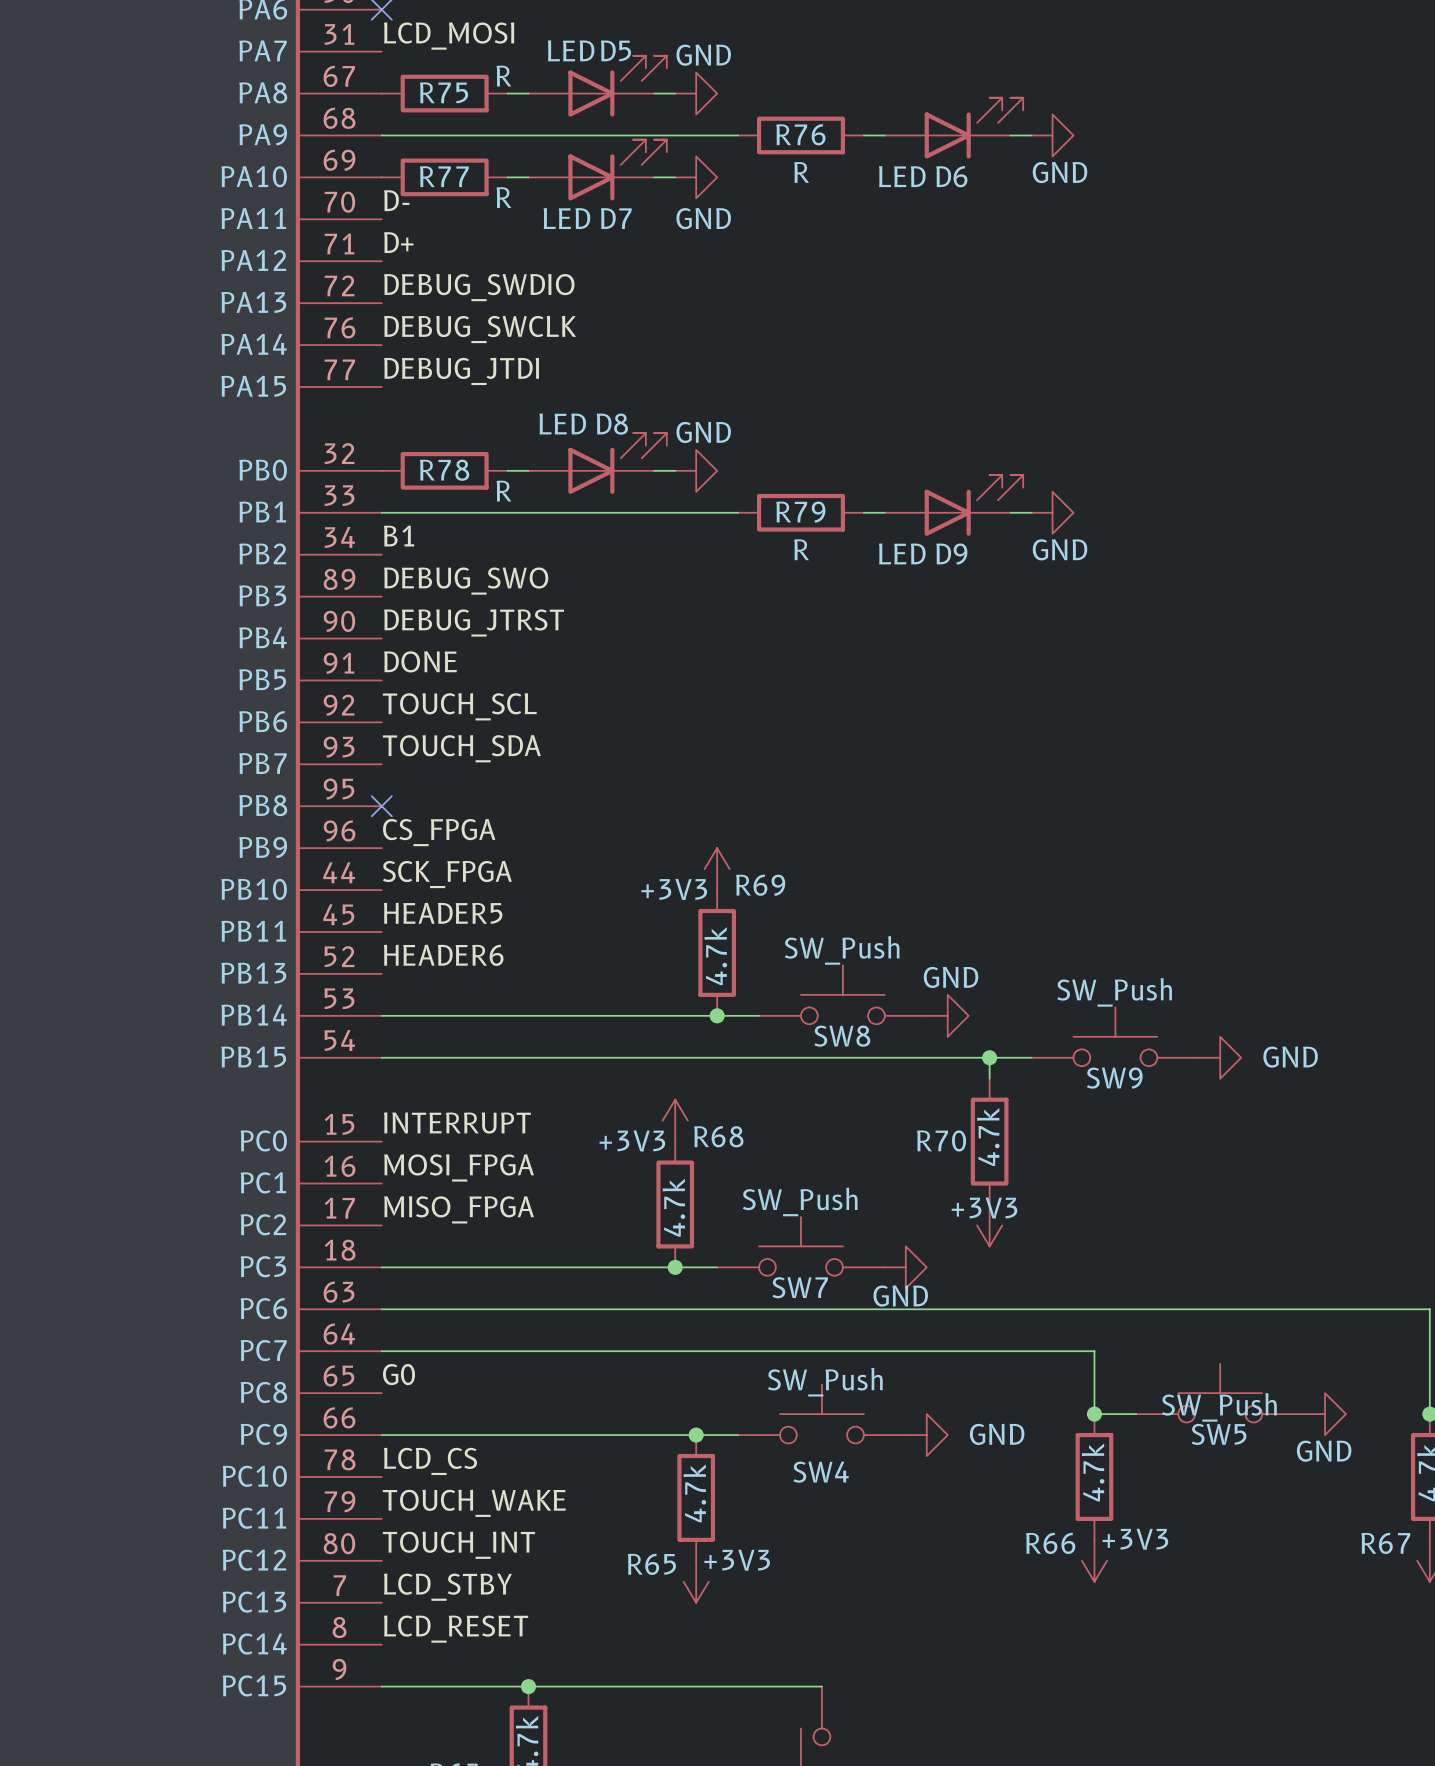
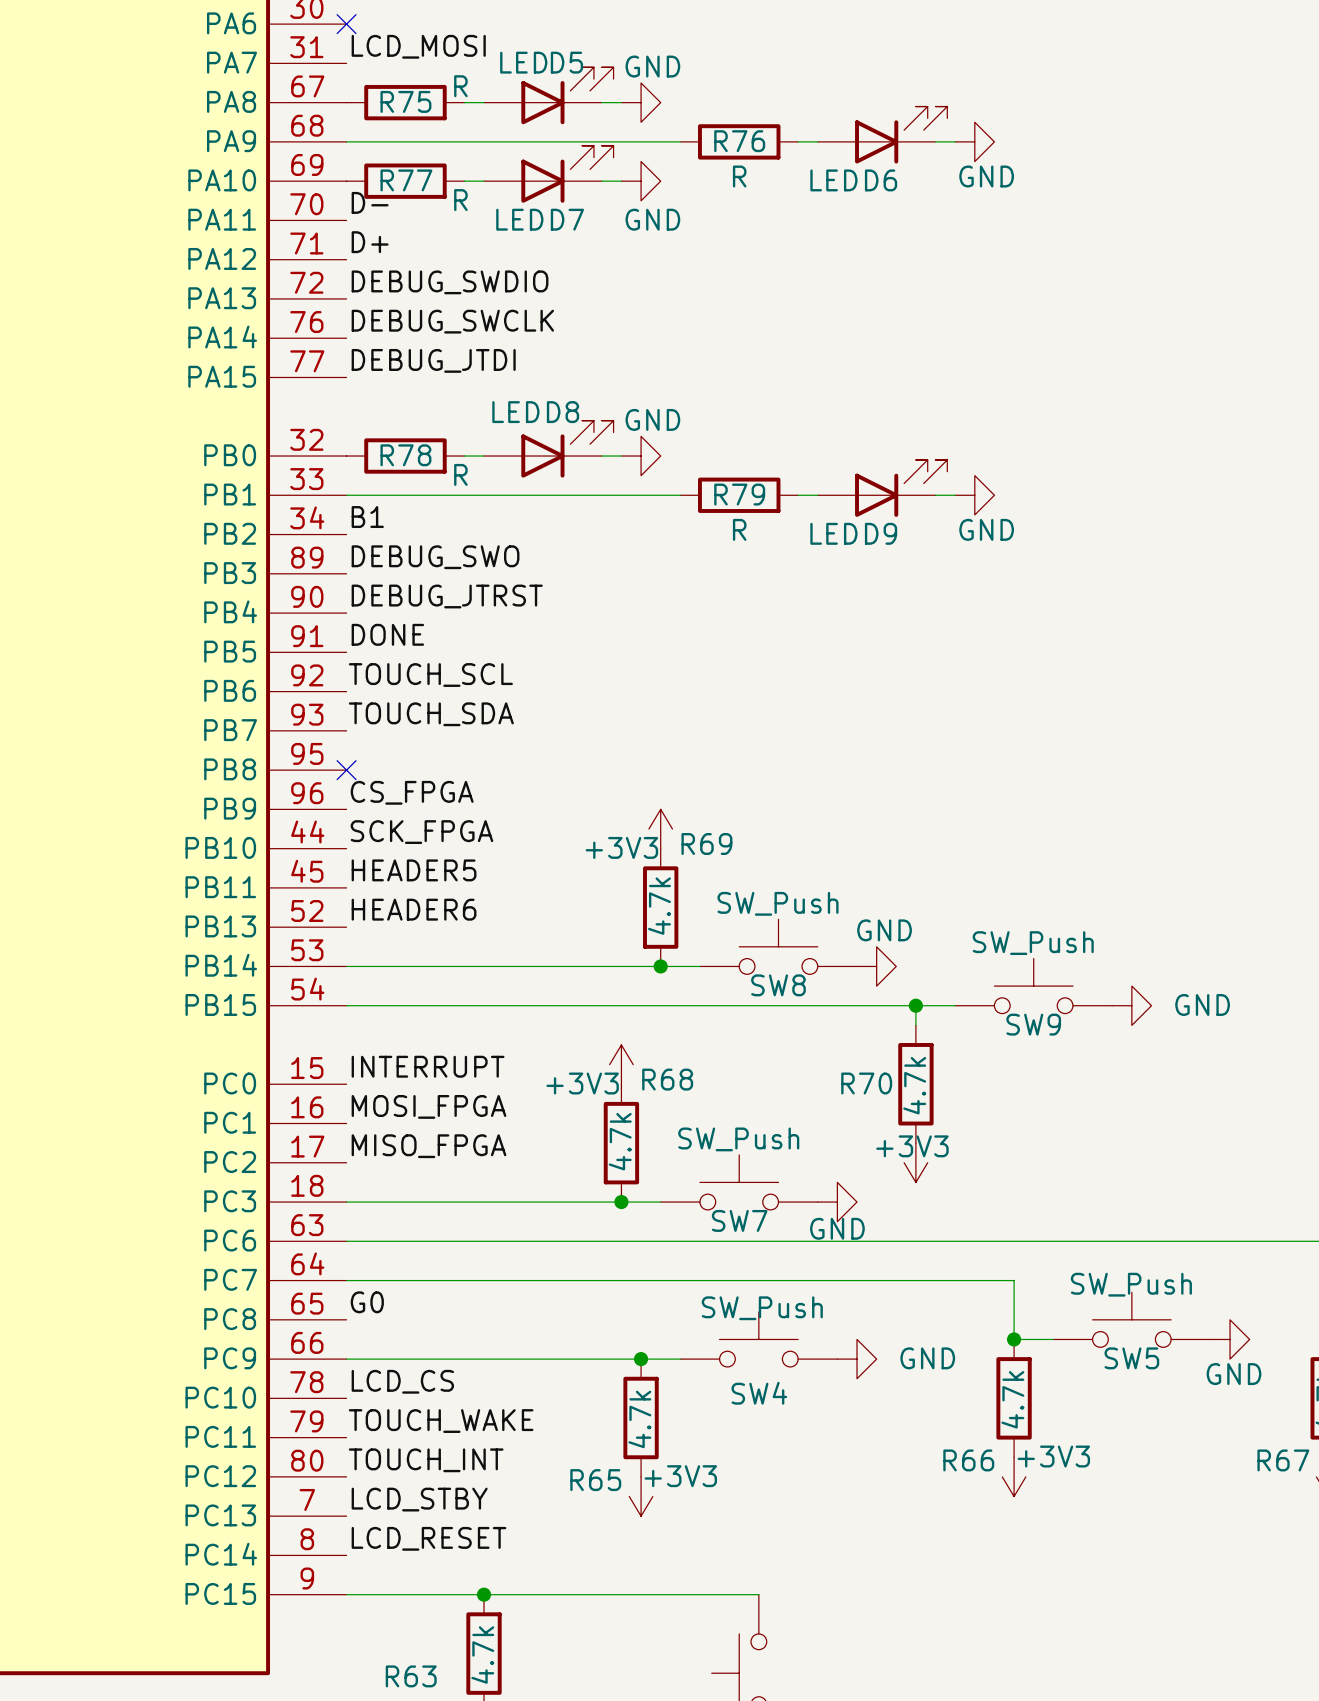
SW5 value position: SW_Push (1219, 1407) -> SW_Push (1131, 1284)

